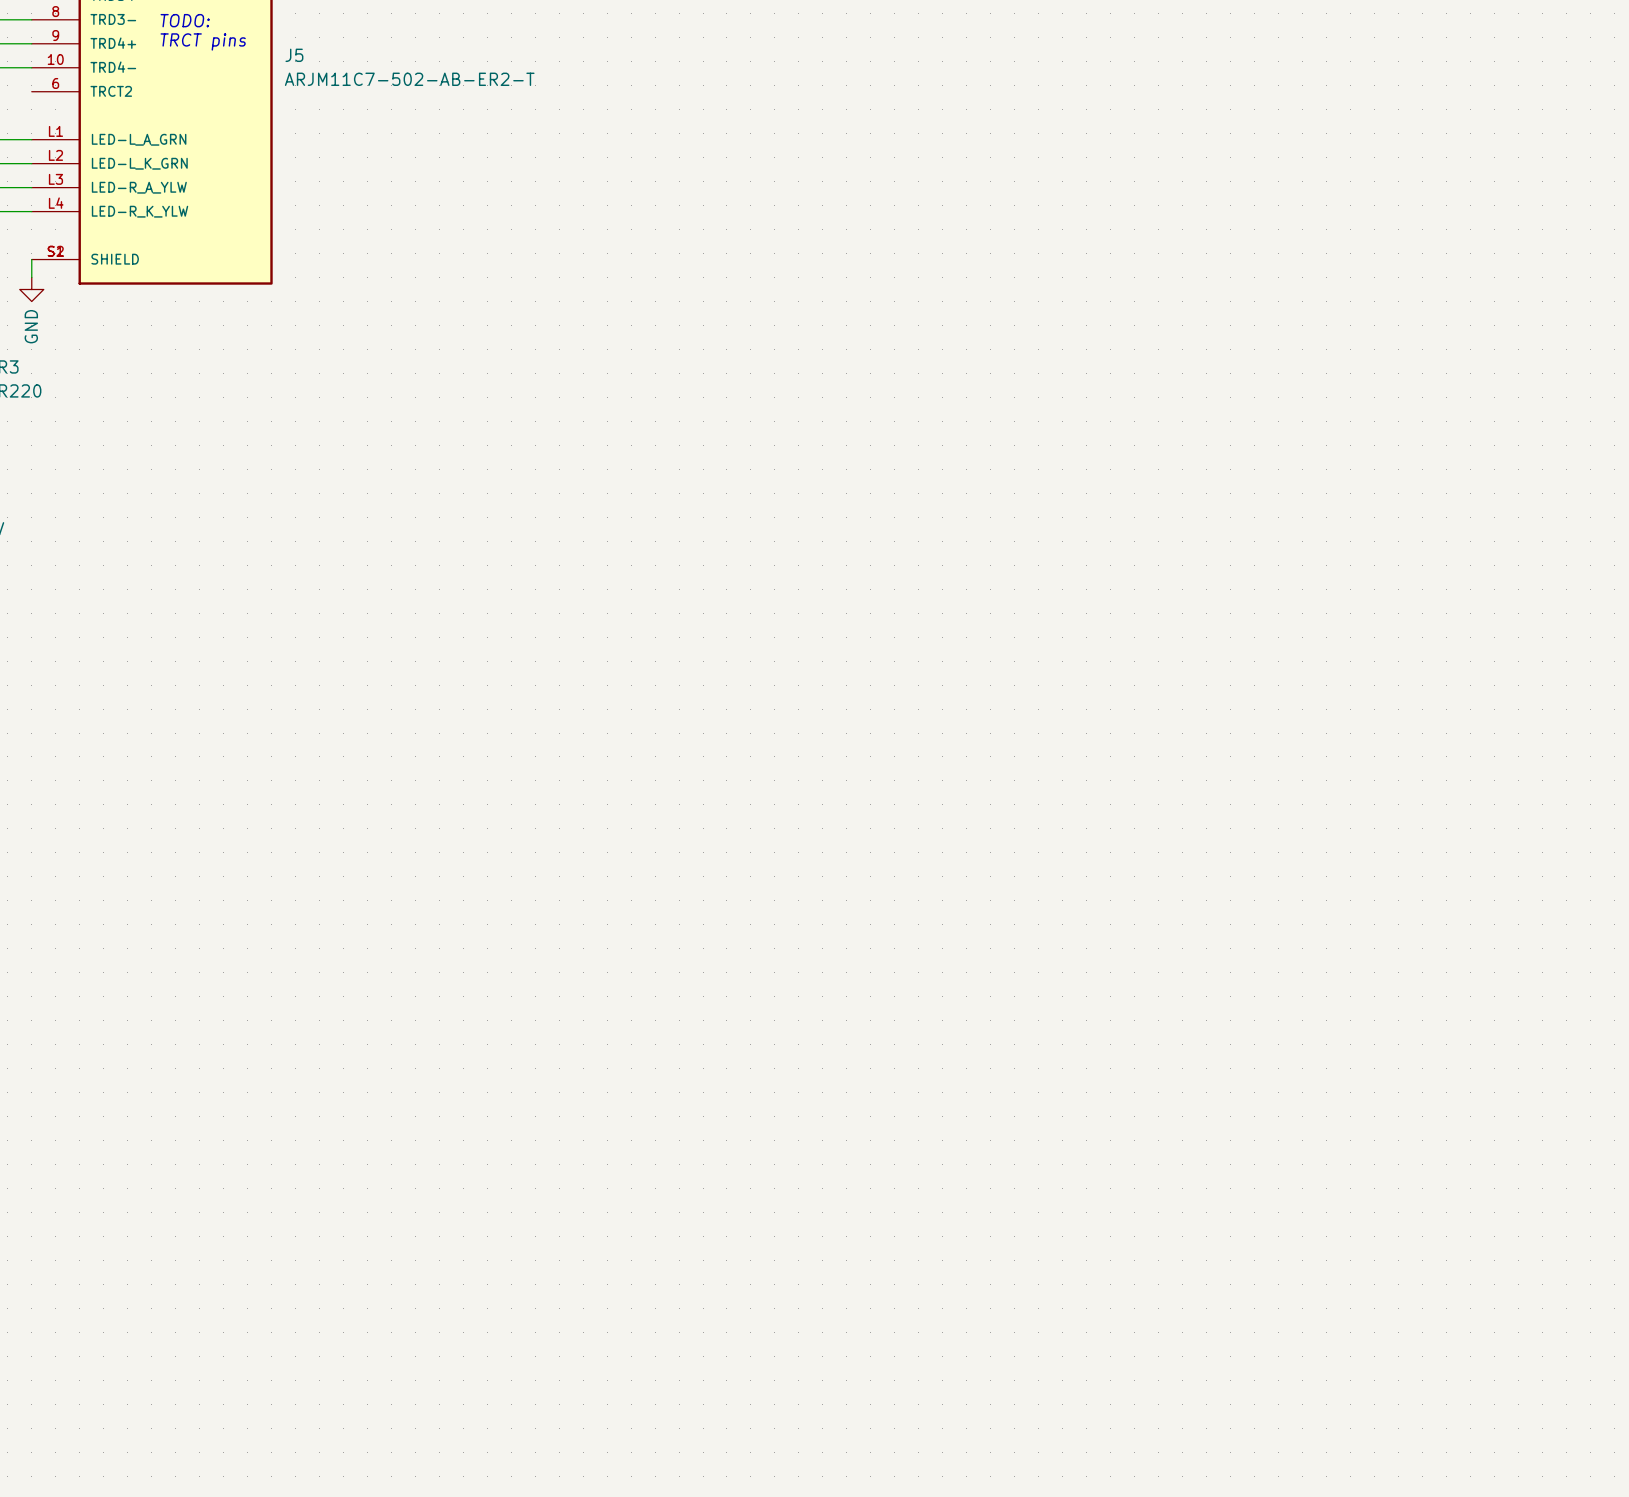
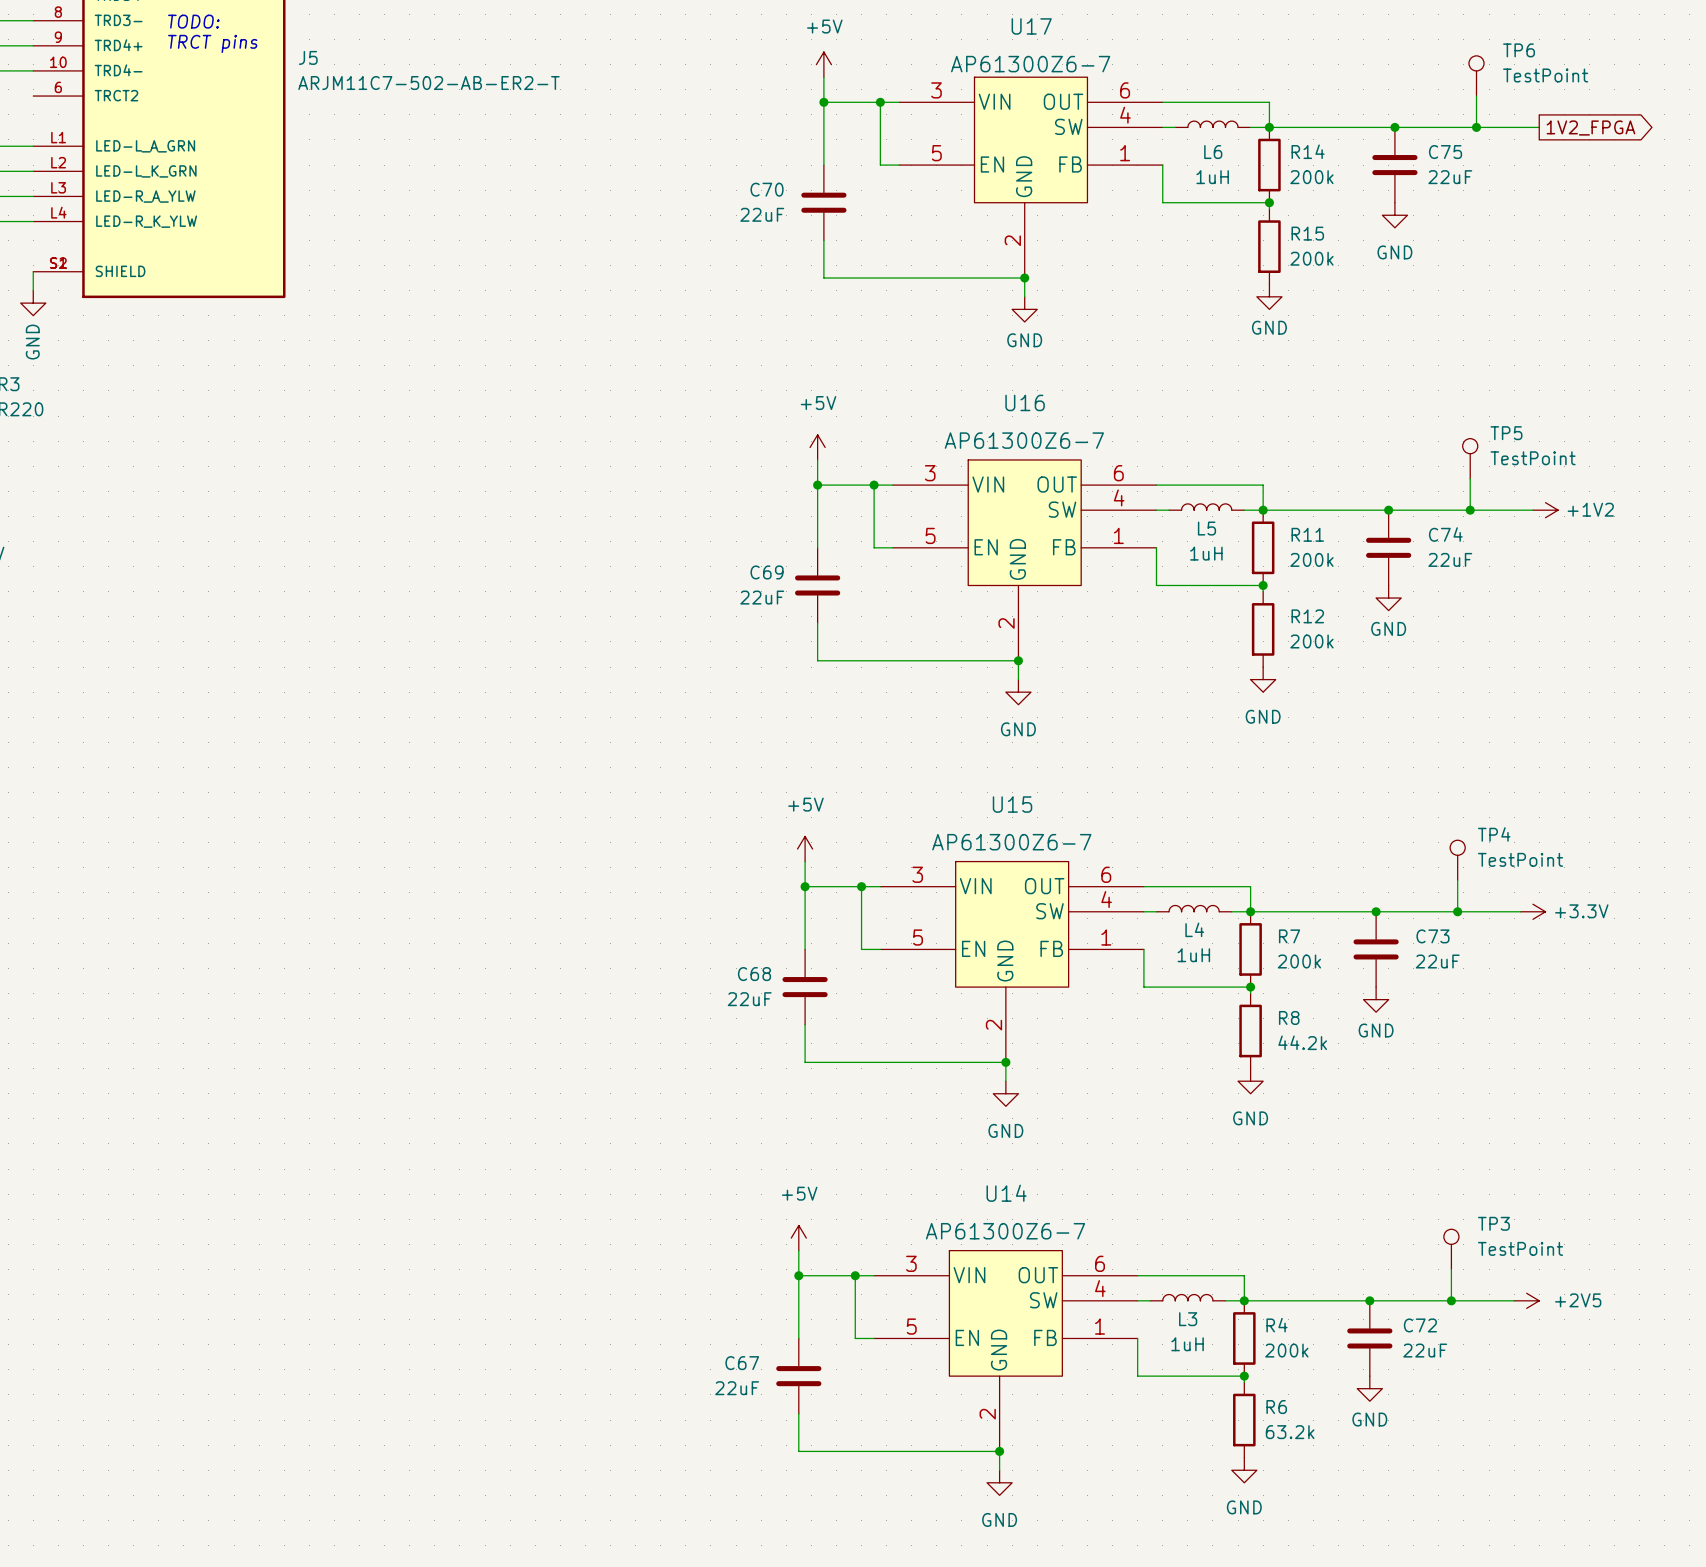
power symbol: none -> +5V (823, 64)
TP6: none -> TestPoint (1476, 75)
wire: none -> (823, 77) (823, 165)
wire: none -> (1476, 96) (1476, 127)
wire: none -> (823, 102) (899, 102)
junction: none -> (823, 102)
wire: none -> (880, 102) (880, 165) (899, 165)
junction: none -> (880, 102)
wire: none -> (1162, 102) (1269, 102) (1269, 127)
L6: none -> 1uH (1212, 124)
wire: none -> (1162, 127) (1175, 127)
wire: none -> (1250, 127) (1539, 127)
junction: none -> (1269, 127)
junction: none -> (1394, 127)
junction: none -> (1476, 127)
global label: none -> 1V2_FPGA (1590, 128)
wire: none -> (1162, 165) (1162, 202) (1269, 202) (1269, 208)
R14: none -> 200k (1269, 165)
C75: none -> 22uF (1394, 165)
U17: none -> AP61300Z6-7 (1030, 177)
C70: none -> 22uF (823, 202)
junction: none -> (1269, 202)
power symbol: none -> GND (1394, 215)
wire: none -> (823, 240) (823, 278) (1024, 278) (1024, 296)
R15: none -> 200k (1269, 246)
junction: none -> (1024, 278)
power symbol: none -> GND (1269, 296)
power symbol: none -> GND (1024, 309)
power symbol: none -> +5V (817, 447)
TP5: none -> TestPoint (1470, 458)
wire: none -> (817, 459) (817, 547)
wire: none -> (1470, 478) (1470, 510)
wire: none -> (817, 485) (892, 485)
junction: none -> (817, 485)
wire: none -> (874, 485) (874, 547) (892, 547)
junction: none -> (874, 485)
wire: none -> (1156, 485) (1263, 485) (1263, 510)
L5: none -> 1uH (1206, 507)
wire: none -> (1156, 510) (1169, 510)
wire: none -> (1244, 510) (1532, 510)
junction: none -> (1263, 510)
junction: none -> (1388, 510)
junction: none -> (1470, 510)
power symbol: none -> +1V2 (1545, 510)
wire: none -> (1156, 547) (1156, 585) (1263, 585) (1263, 591)
R11: none -> 200k (1263, 547)
C74: none -> 22uF (1388, 547)
U16: none -> AP61300Z6-7 (1024, 560)
C69: none -> 22uF (817, 585)
junction: none -> (1263, 585)
power symbol: none -> GND (1388, 598)
wire: none -> (817, 623) (817, 660) (1018, 660) (1018, 679)
R12: none -> 200k (1263, 629)
junction: none -> (1018, 660)
power symbol: none -> GND (1263, 679)
power symbol: none -> GND (1018, 692)
power symbol: none -> +5V (805, 849)
TP4: none -> TestPoint (1457, 860)
wire: none -> (805, 861) (805, 949)
wire: none -> (1457, 880) (1457, 911)
wire: none -> (805, 886) (880, 886)
junction: none -> (805, 886)
wire: none -> (861, 886) (861, 949) (880, 949)
junction: none -> (861, 886)
wire: none -> (1143, 886) (1250, 886) (1250, 911)
L4: none -> 1uH (1194, 908)
wire: none -> (1143, 911) (1156, 911)
wire: none -> (1231, 911) (1520, 911)
junction: none -> (1250, 911)
junction: none -> (1376, 911)
junction: none -> (1457, 911)
power symbol: none -> +3.3V (1532, 911)
wire: none -> (1143, 949) (1143, 987) (1250, 987) (1250, 993)
R7: none -> 200k (1250, 949)
C73: none -> 22uF (1376, 949)
U15: none -> AP61300Z6-7 (1012, 961)
C68: none -> 22uF (805, 987)
junction: none -> (1250, 987)
power symbol: none -> GND (1376, 999)
wire: none -> (805, 1024) (805, 1062) (1005, 1062) (1005, 1081)
R8: none -> 44.2k (1250, 1031)
junction: none -> (1005, 1062)
power symbol: none -> GND (1250, 1081)
power symbol: none -> GND (1005, 1093)
power symbol: none -> +5V (798, 1238)
TP3: none -> TestPoint (1451, 1249)
wire: none -> (798, 1250) (798, 1338)
wire: none -> (1451, 1269) (1451, 1300)
wire: none -> (798, 1275) (874, 1275)
junction: none -> (798, 1275)
wire: none -> (855, 1275) (855, 1338) (874, 1338)
junction: none -> (855, 1275)
wire: none -> (1137, 1275) (1244, 1275) (1244, 1300)
L3: none -> 1uH (1187, 1297)
wire: none -> (1137, 1300) (1150, 1300)
wire: none -> (1225, 1300) (1514, 1300)
junction: none -> (1244, 1300)
junction: none -> (1369, 1300)
junction: none -> (1451, 1300)
power symbol: none -> +2V5 (1526, 1300)
wire: none -> (1137, 1338) (1137, 1376) (1244, 1376) (1244, 1382)
R4: none -> 200k (1244, 1338)
C72: none -> 22uF (1369, 1338)
U14: none -> AP61300Z6-7 (1005, 1351)
C67: none -> 22uF (798, 1376)
junction: none -> (1244, 1376)
power symbol: none -> GND (1369, 1388)
wire: none -> (798, 1413) (798, 1451) (999, 1451) (999, 1470)
R6: none -> 63.2k (1244, 1420)
junction: none -> (999, 1451)
power symbol: none -> GND (1244, 1470)
power symbol: none -> GND (999, 1482)

